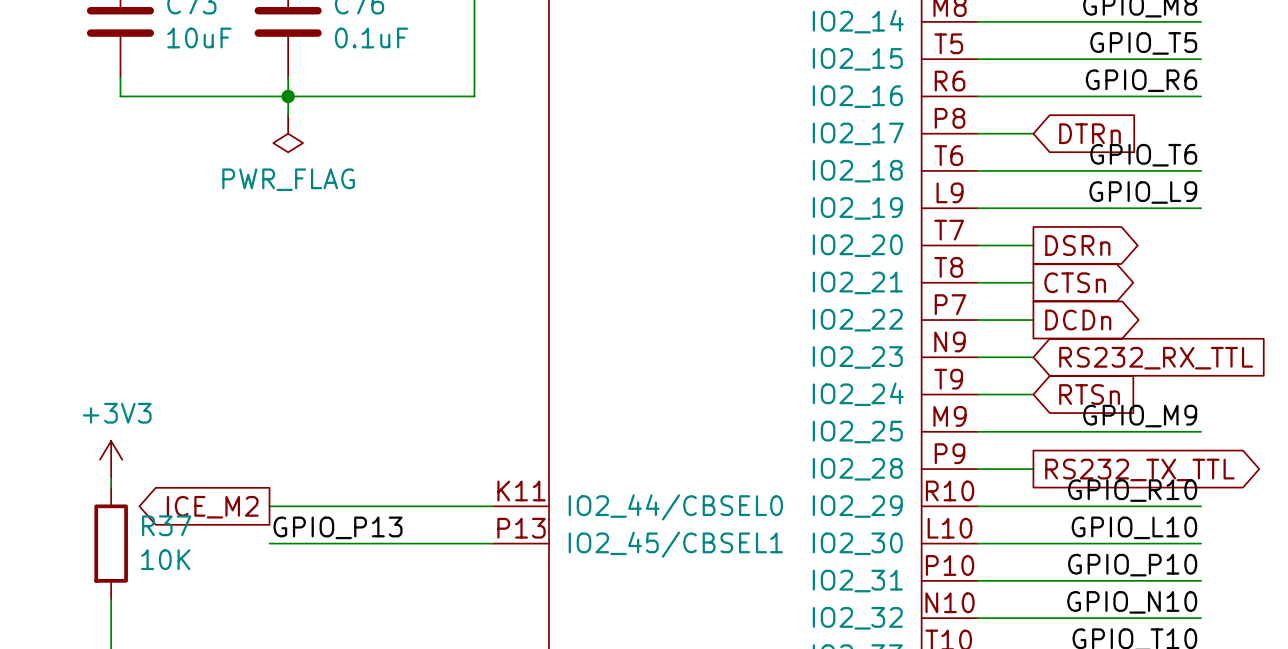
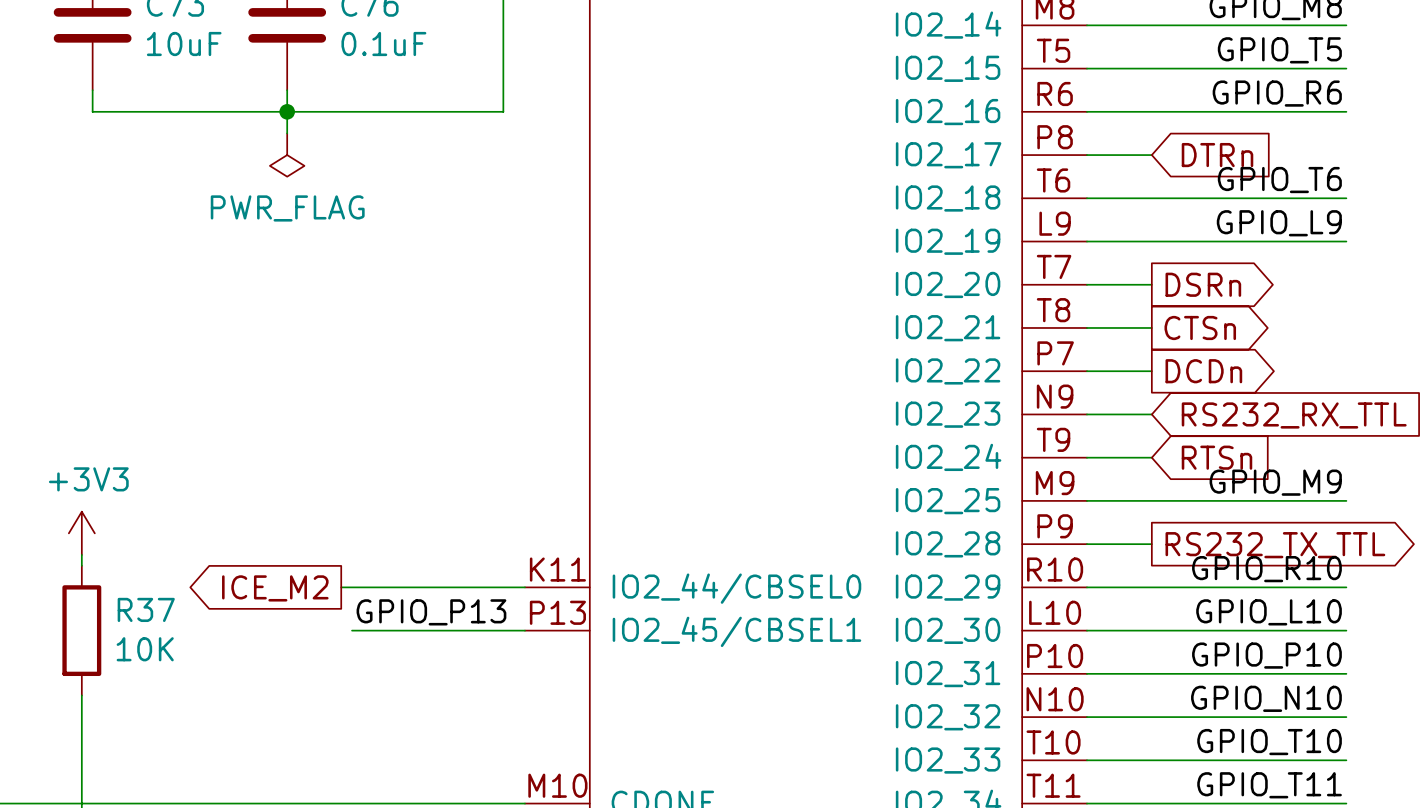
wire: (269, 506) (334, 506) -> none
global label position: ICE_M2 (212, 507) -> ICE_M2 (275, 588)
label position: GPIO_P13 (337, 527) -> GPIO_P13 (431, 612)
wire: (269, 543) (344, 543) -> none

